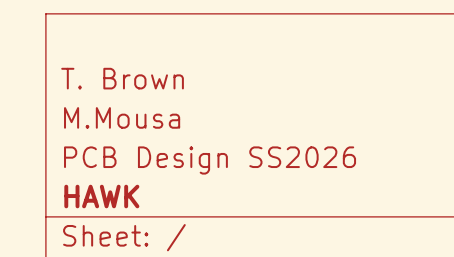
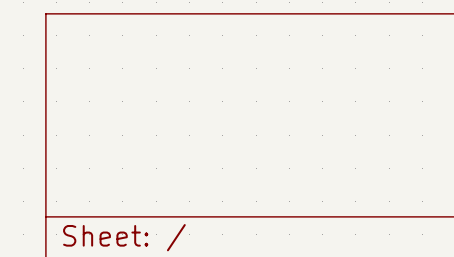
title block: T. Brown (122, 78) -> none
title block: M.Mousa (122, 117) -> none
title block: PCB Design SS2026 (210, 160) -> none
title block: HAWK (101, 196) -> none

